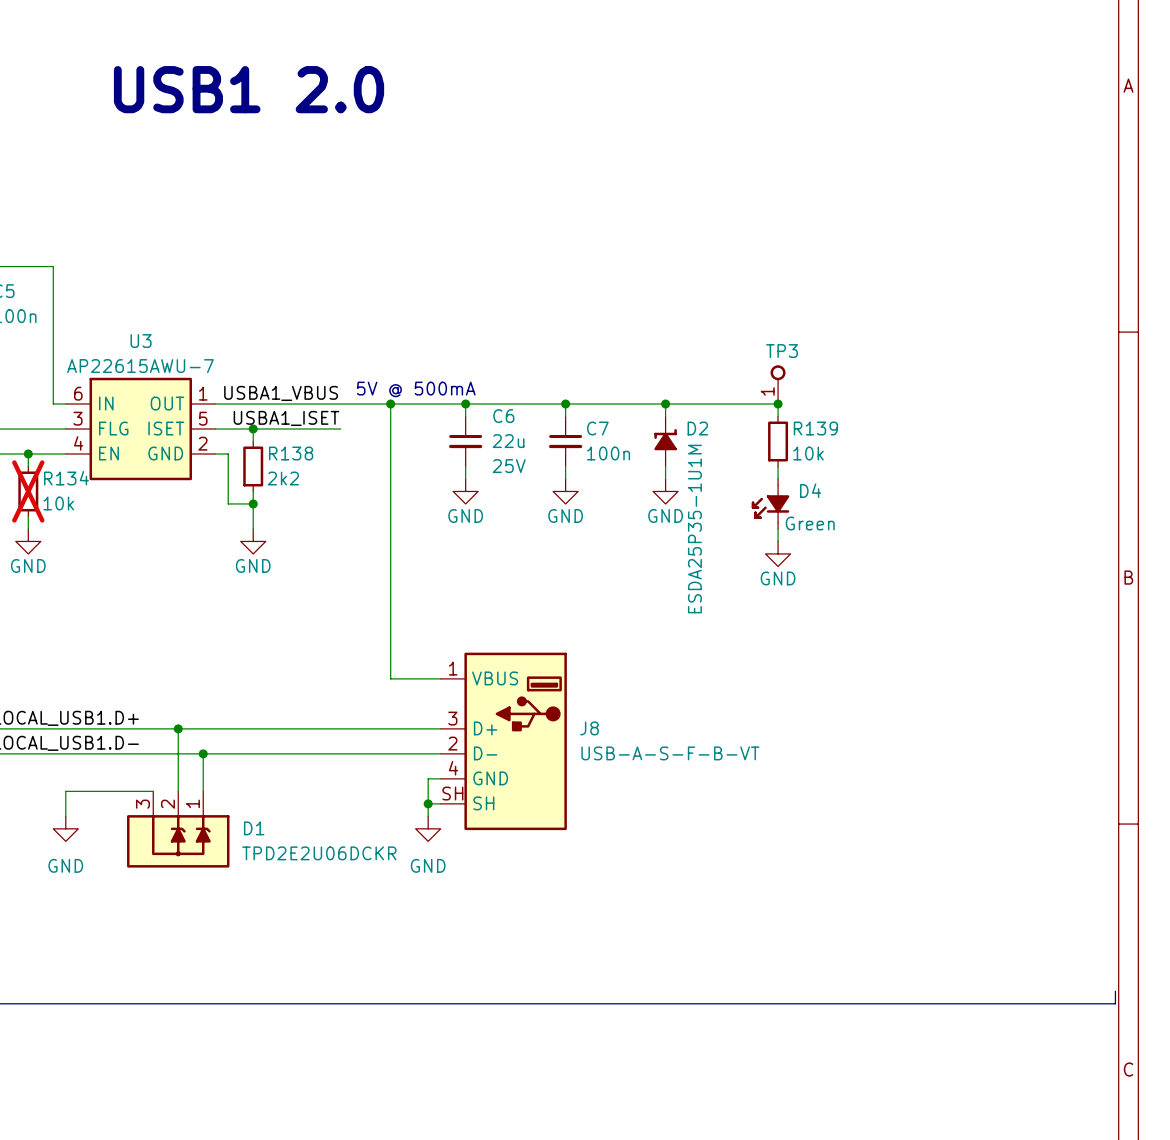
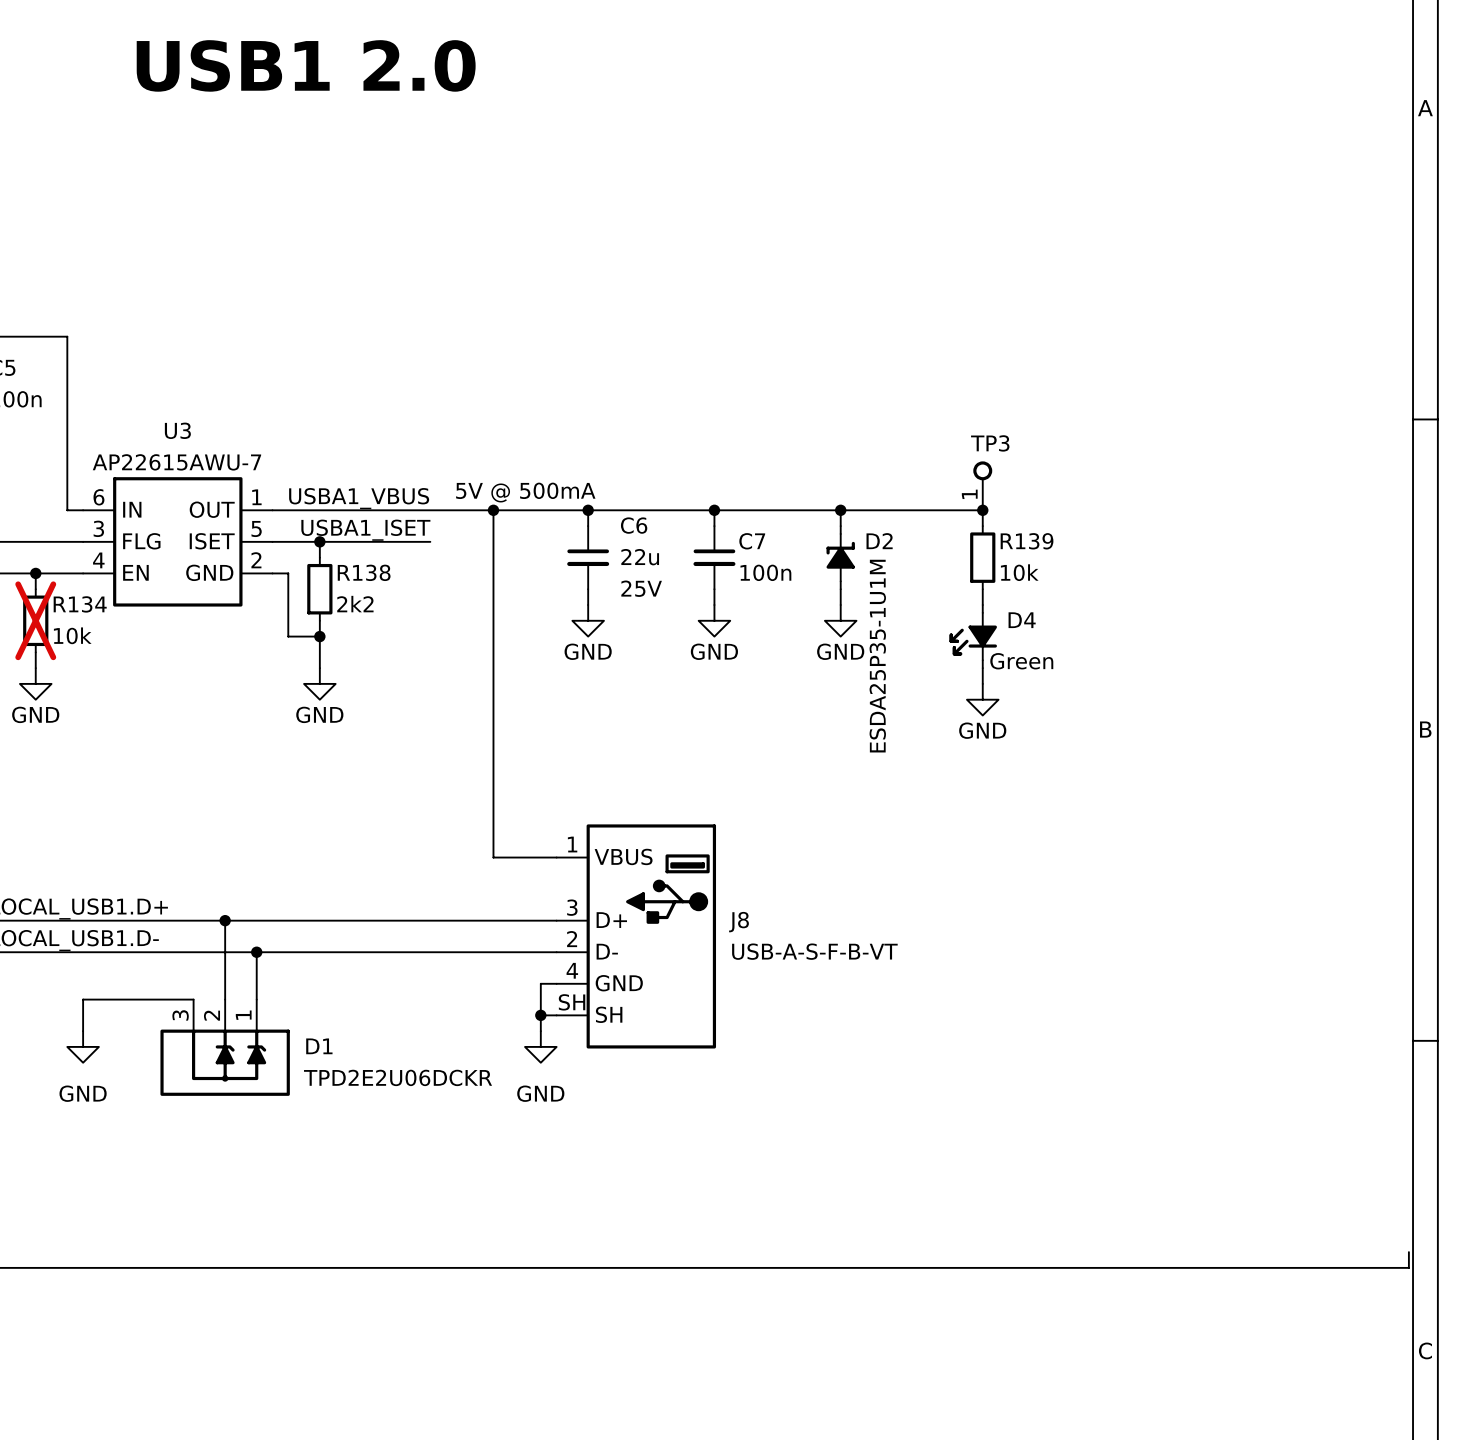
text position: USB1 2.0 (249, 89) -> USB1 2.0 (306, 65)

